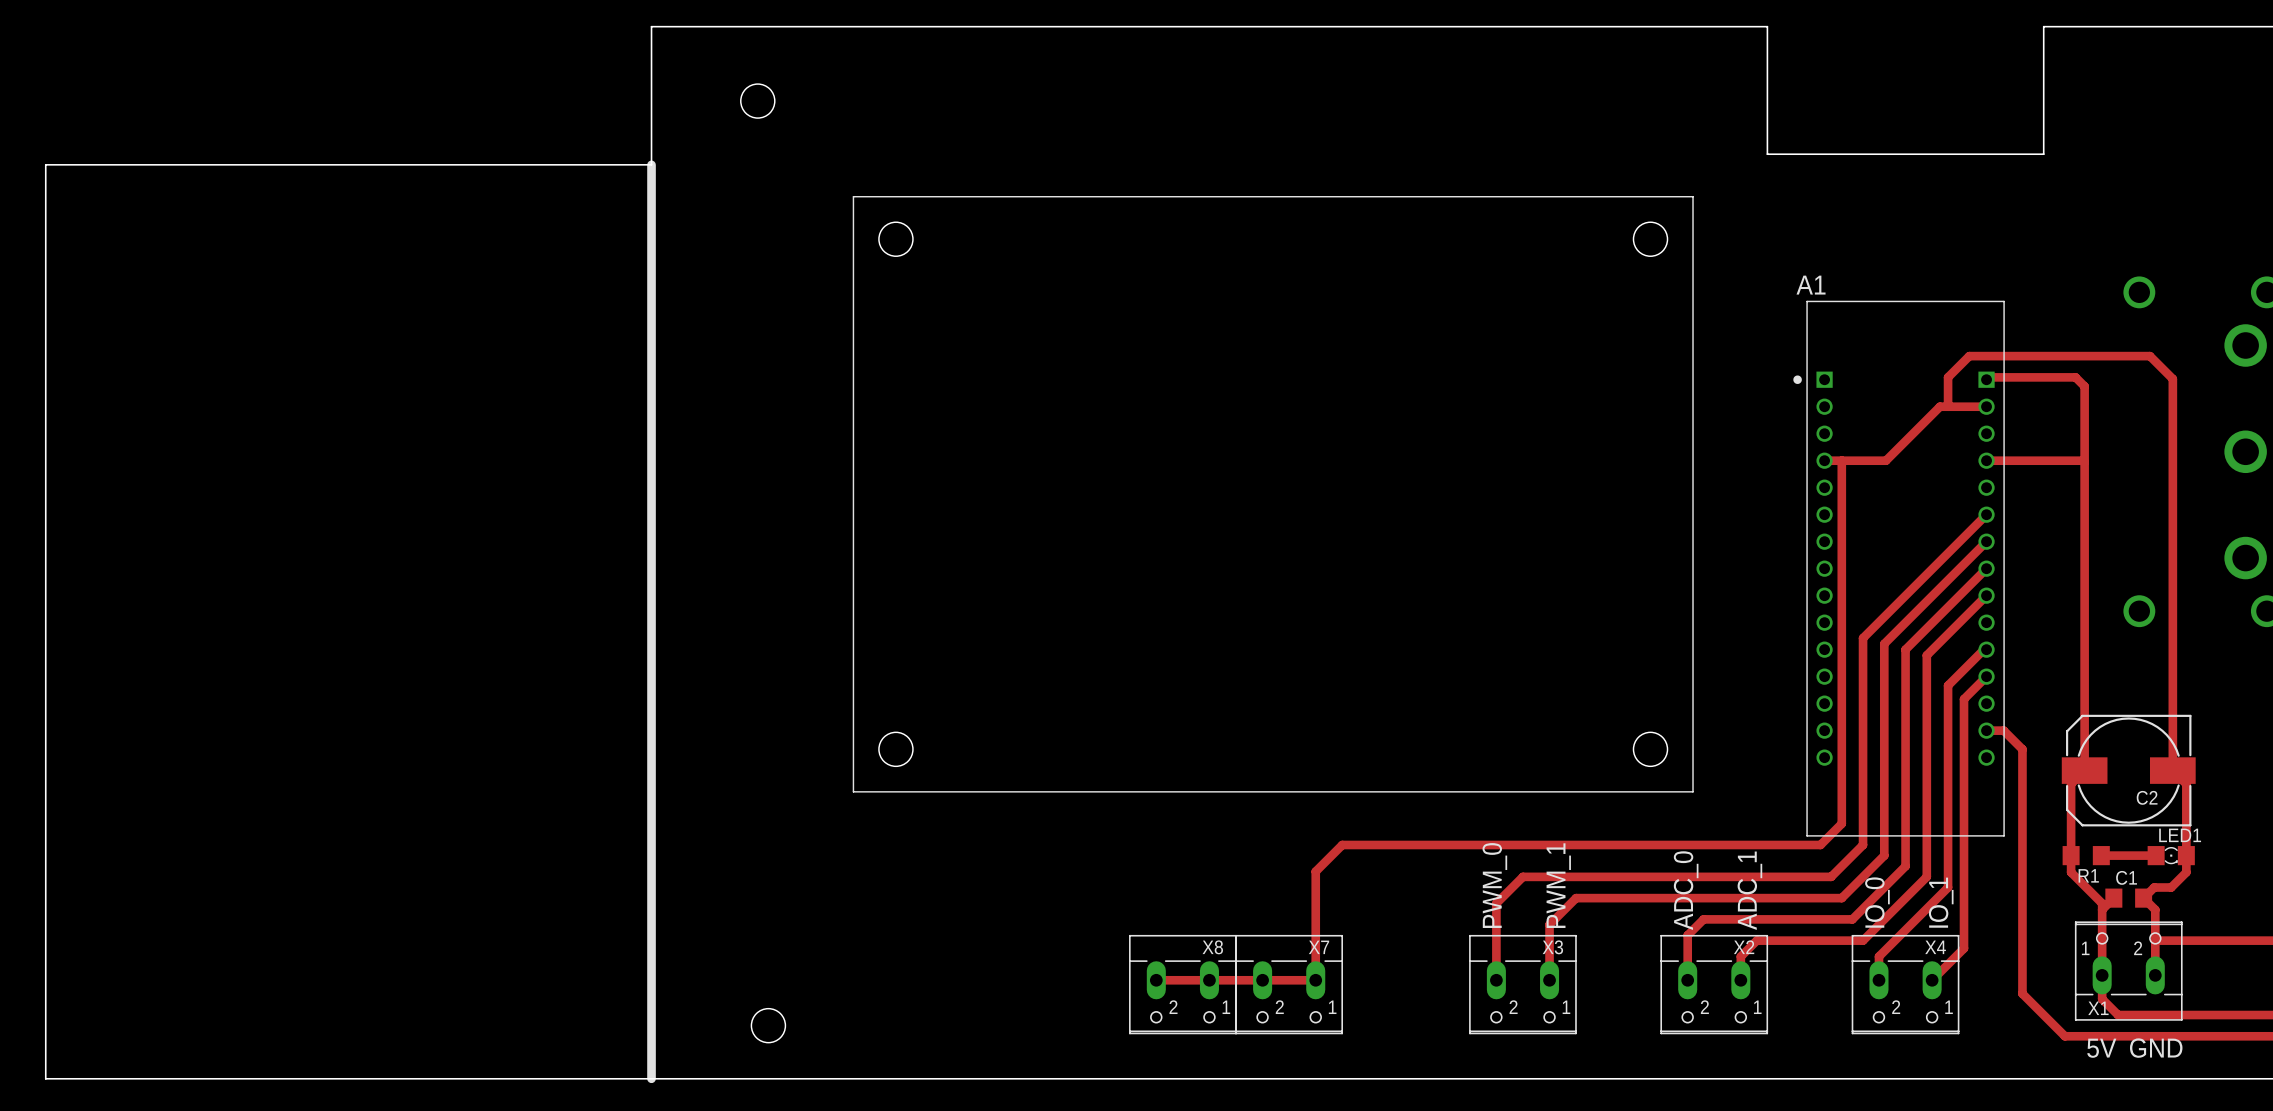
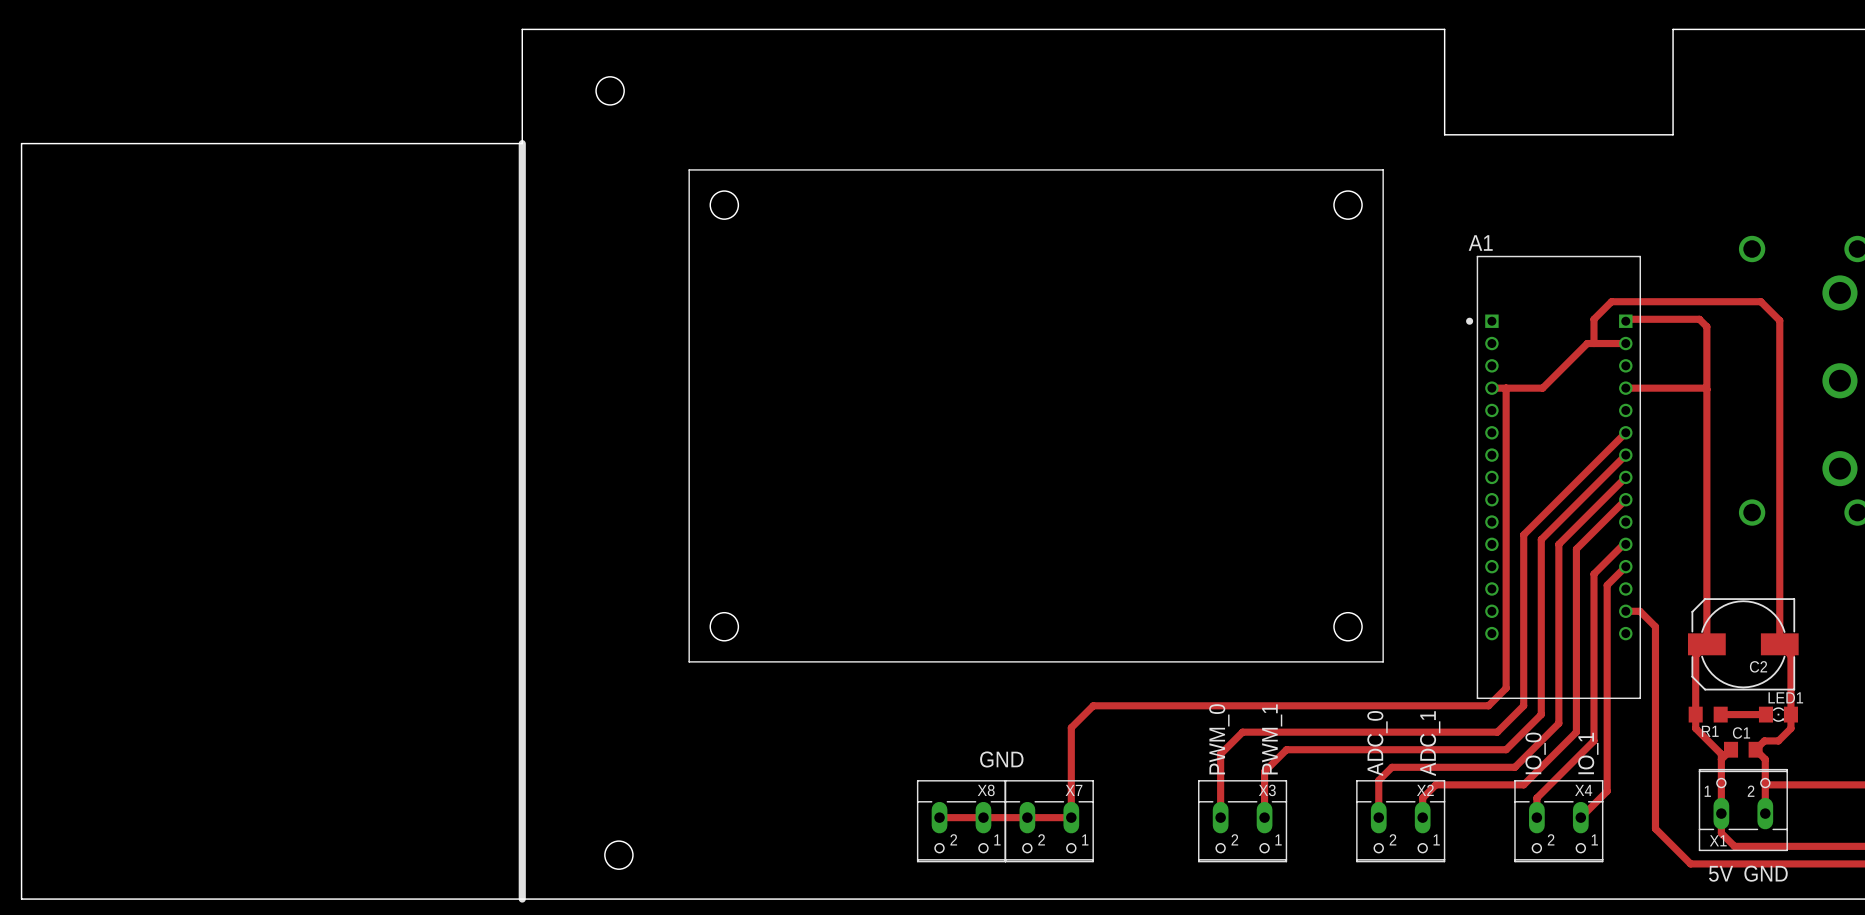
text: none -> GND (1001, 759)

